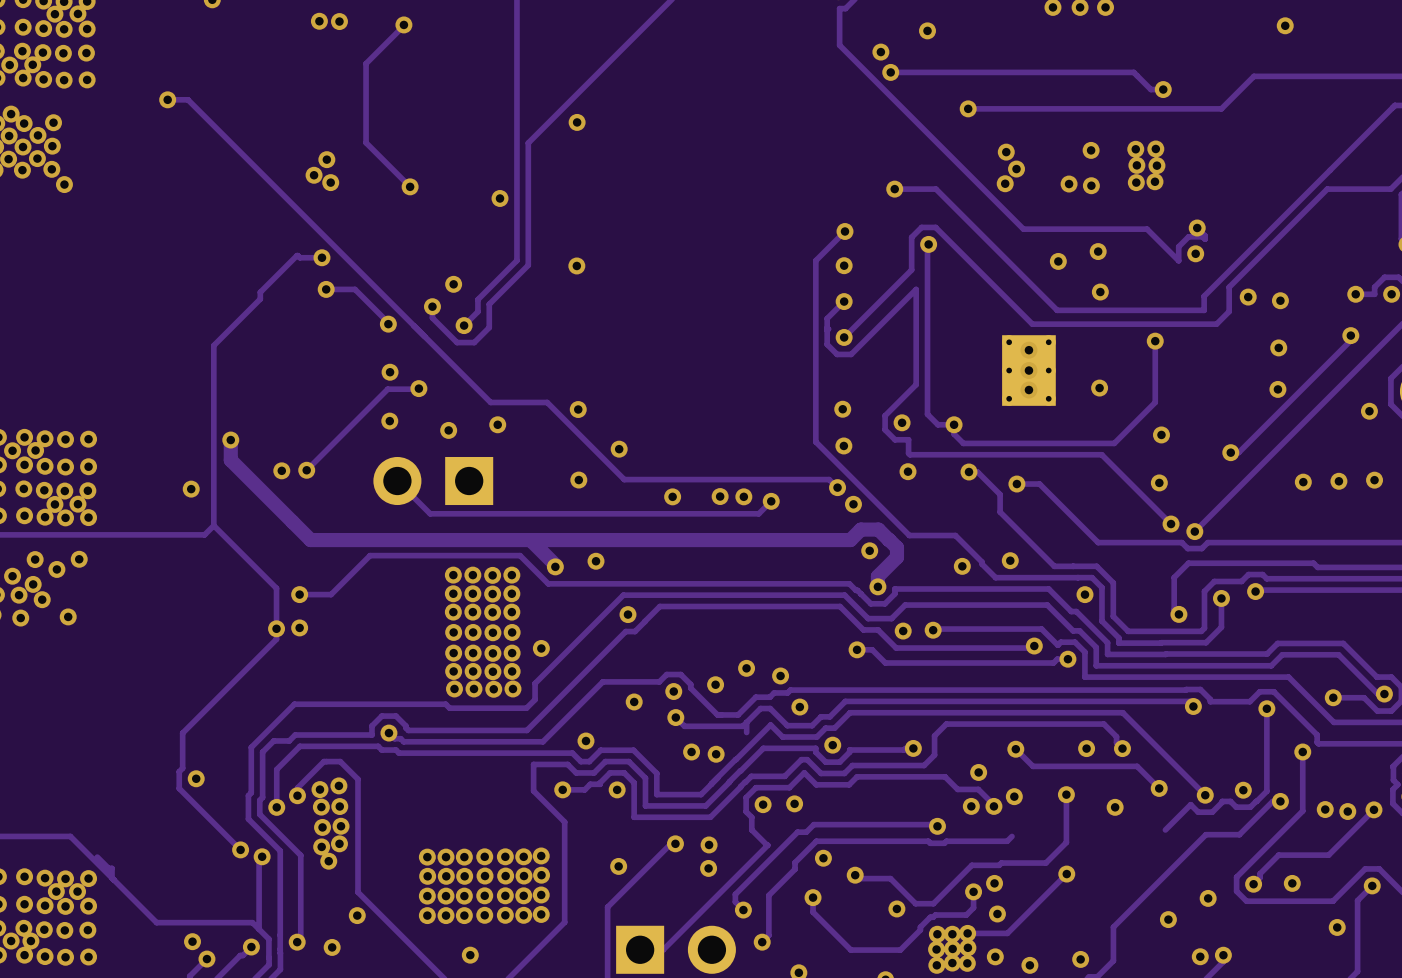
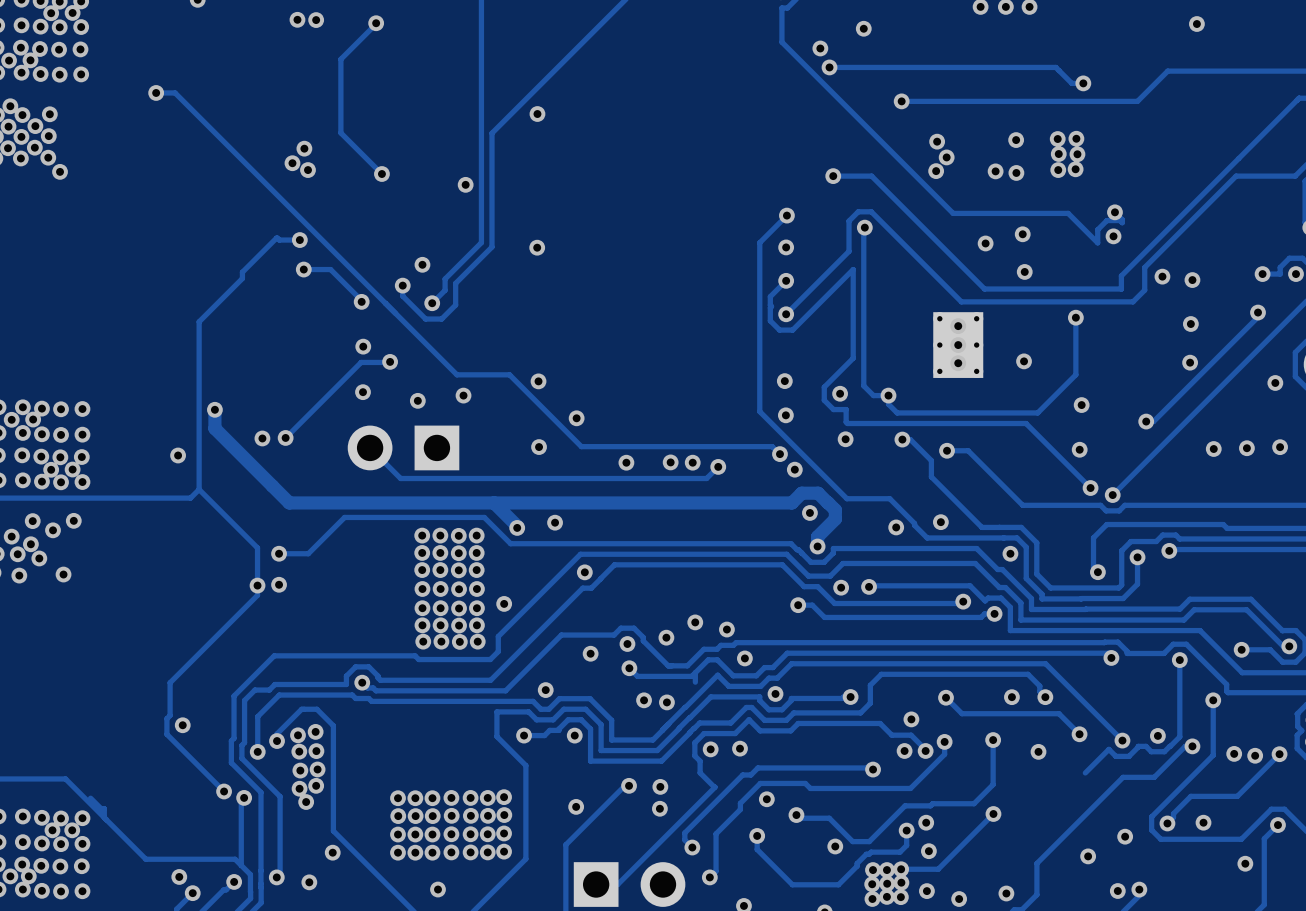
track: (1011, 836) (1007, 841) (946, 841) (944, 843) (930, 843) (928, 841) (864, 841) -> (944, 741) (944, 754) (910, 788) (810, 788) (805, 783)

